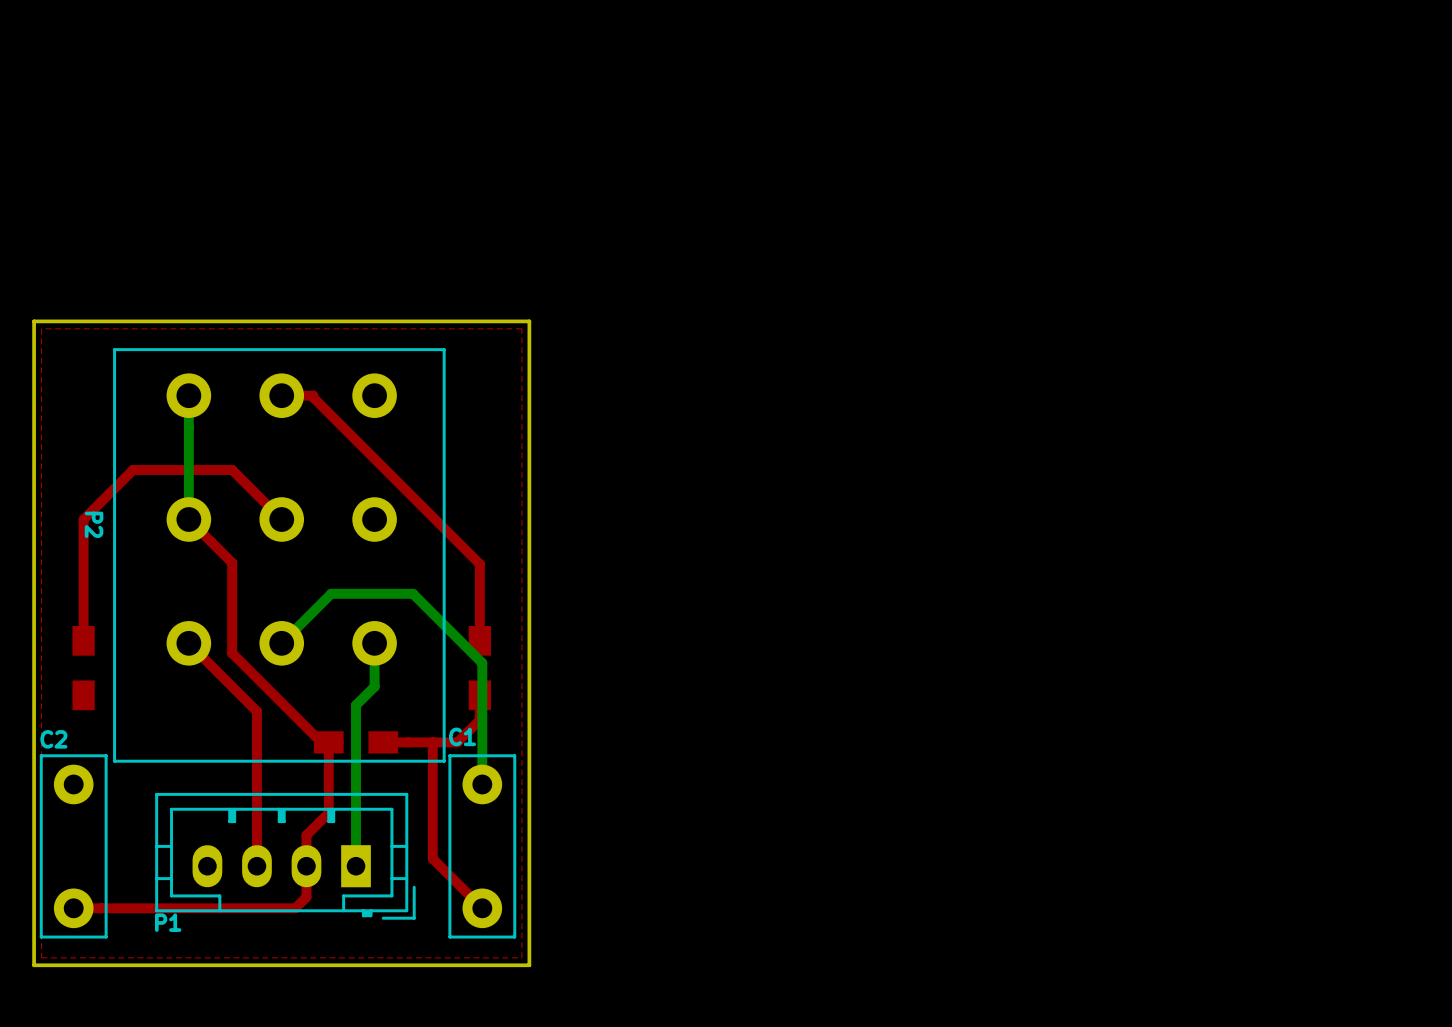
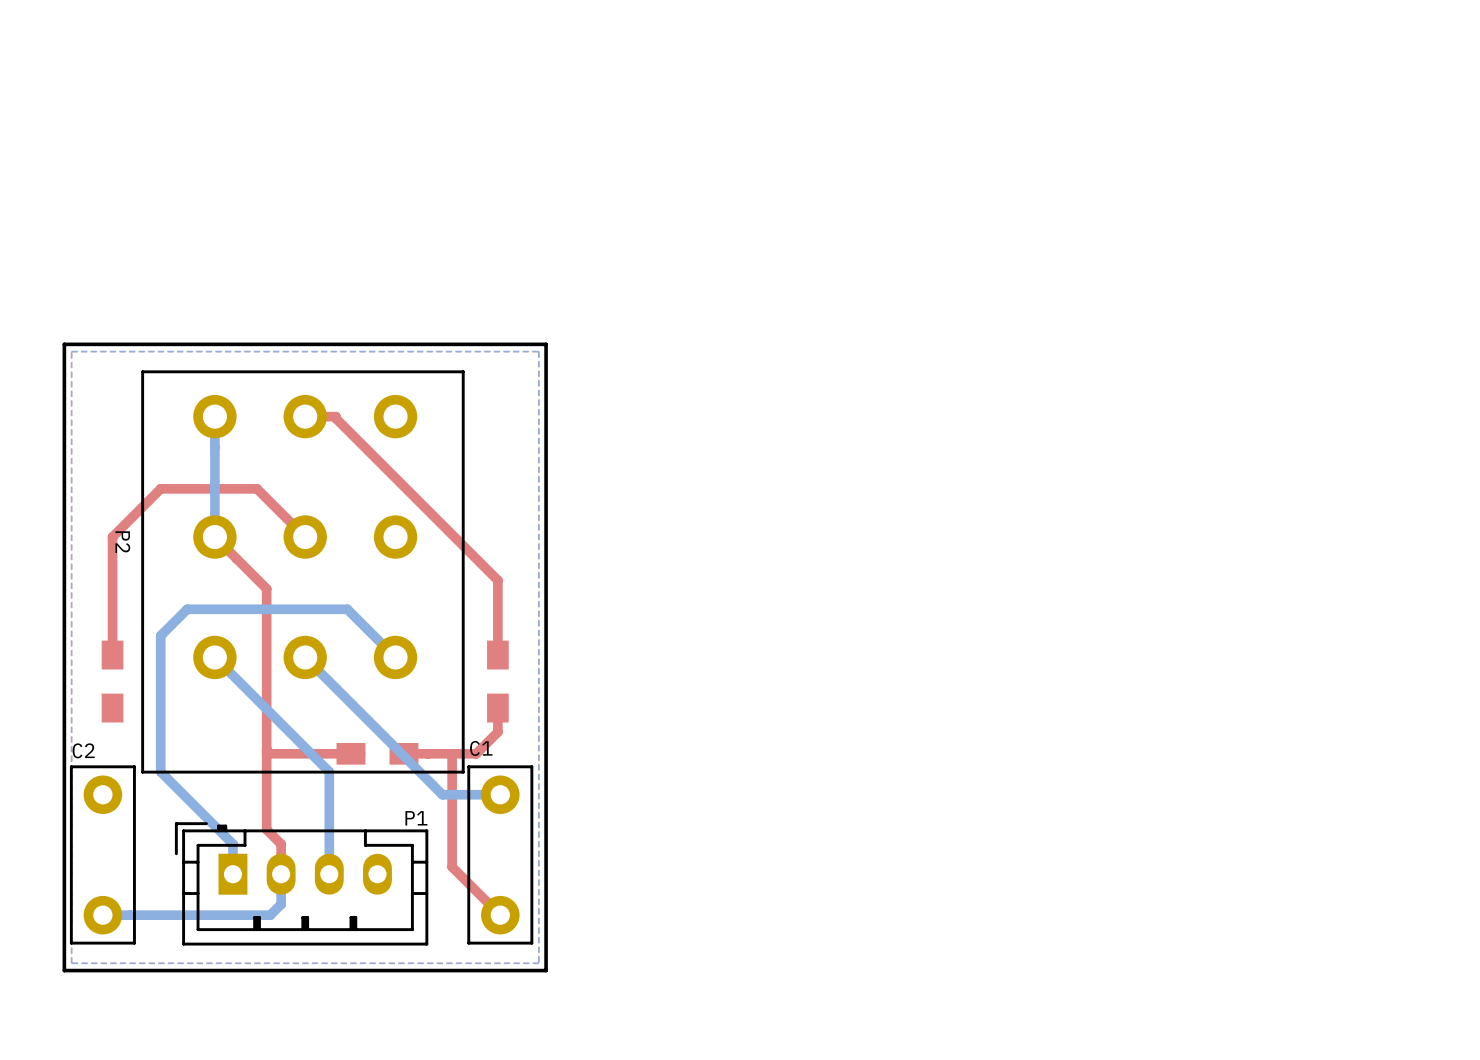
bottom zone outline: none -> (538, 351) (71, 351) (71, 963) (538, 963) (538, 351)
top track: (232, 562) (232, 653) (321, 742) -> (266, 753) (343, 753)
bottom track: none -> (214, 657) (329, 771) (329, 874)
top track: (188, 643) (256, 711) (256, 835) -> (257, 579) (266, 588) (266, 829) (281, 844)
bottom track: (281, 643) (331, 593) (412, 593) (482, 663) (482, 784) -> (305, 657) (442, 794) (500, 794)
bottom track: (374, 643) (374, 686) (356, 705) (356, 866) -> (395, 657) (347, 609) (187, 609) (160, 635) (160, 771) (232, 844) (232, 874)
top track: (328, 742) (328, 812) (306, 835) (306, 866) -> none
P1 rotation: 0° (285, 856) -> 180° (301, 883)
bottom track: none -> (281, 874) (281, 904) (270, 915) (102, 915)
top track: (306, 872) (306, 897) (295, 908) (73, 908) -> none

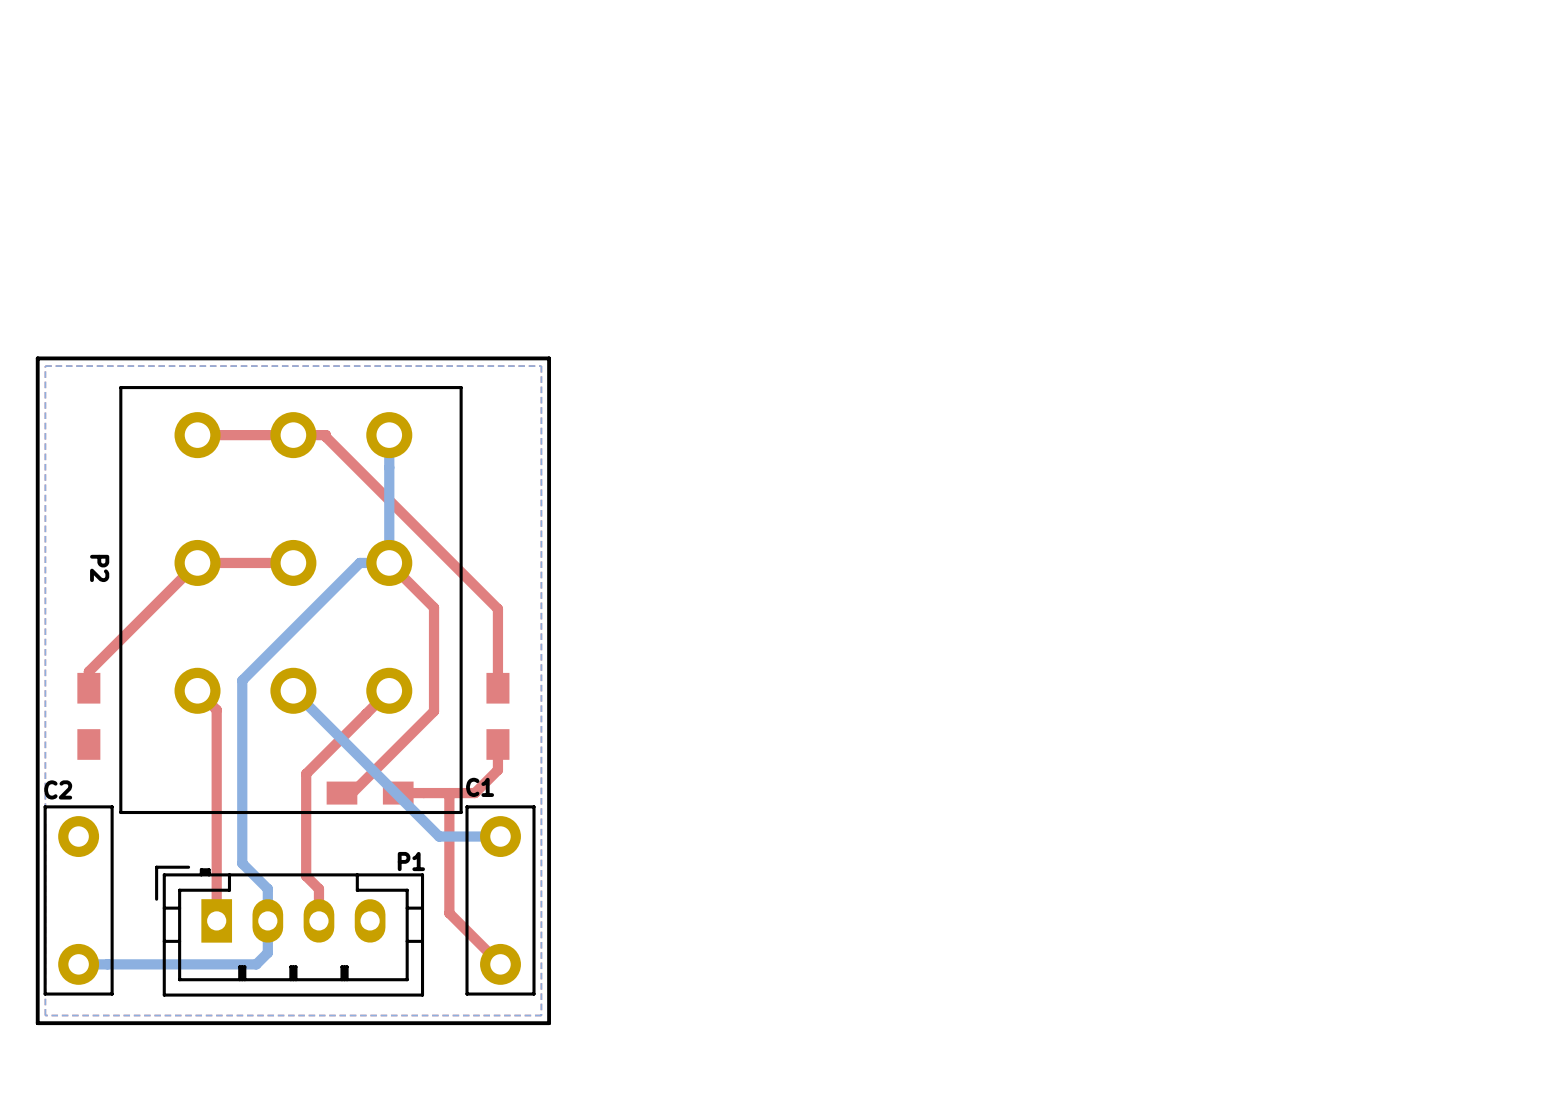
bottom track: (214, 416) (214, 537) -> none
top track: none -> (293, 435) (197, 435)
bottom track: none -> (389, 435) (389, 562) (359, 562) (242, 680) (242, 863) (267, 888) (267, 920)
top track: (214, 537) (266, 588) (266, 829) (281, 844) (281, 874) -> none
top track: (305, 537) (257, 488) (160, 488) (112, 537) (112, 639) -> (293, 562) (197, 562) (88, 671)
top track: none -> (389, 562) (434, 607) (434, 711) (352, 793)
bottom track: (214, 657) (329, 771) (329, 874) -> none
top track: none -> (197, 690) (216, 709) (216, 920)
bottom track: (395, 657) (347, 609) (187, 609) (160, 635) (160, 771) (232, 844) (232, 874) -> none
top track: none -> (389, 690) (306, 773) (306, 876) (318, 888) (318, 920)
top track: (350, 753) (266, 753) -> none

